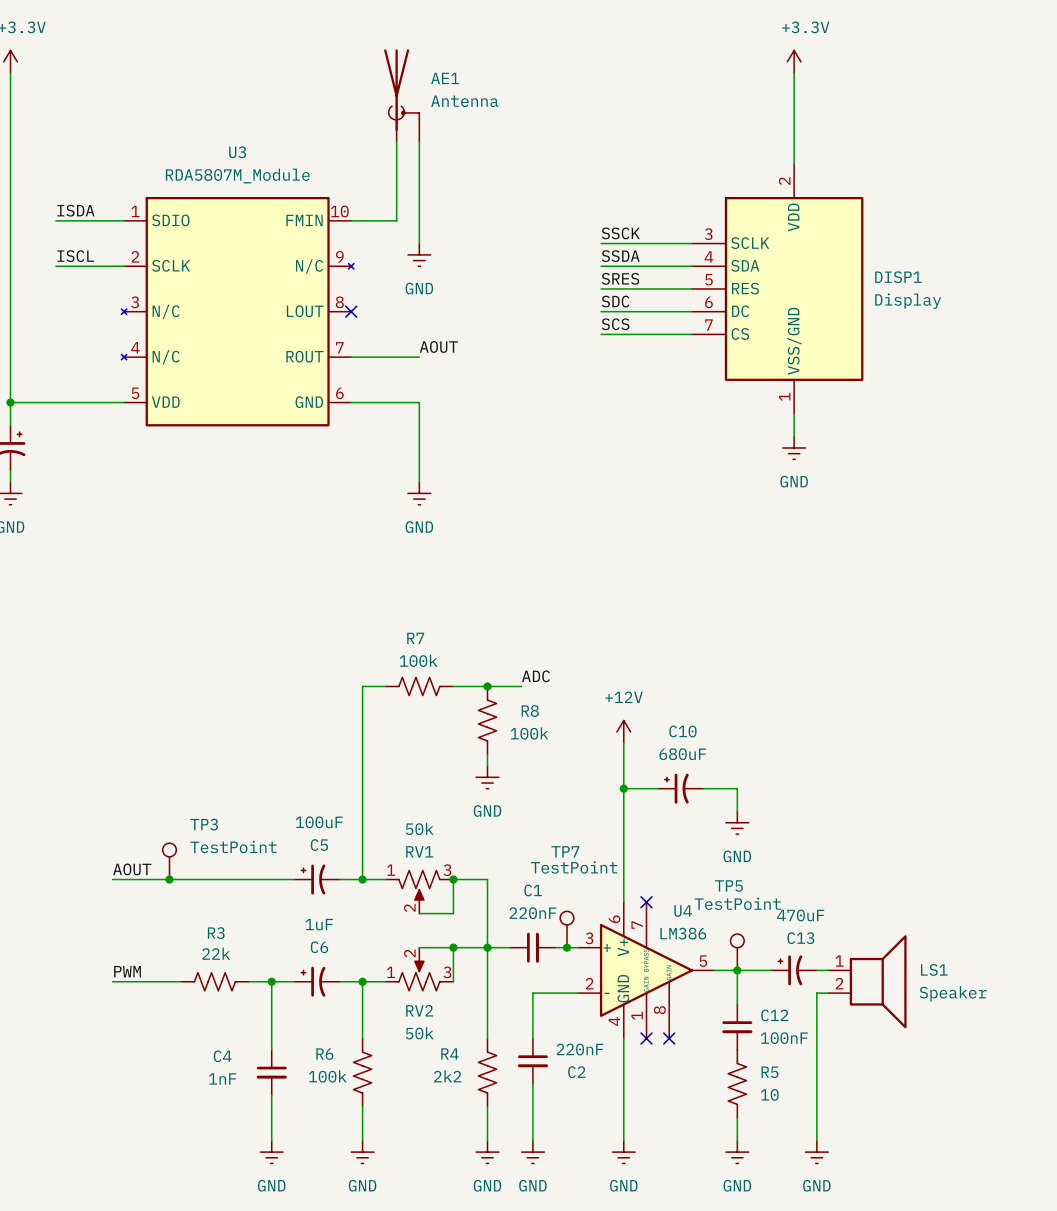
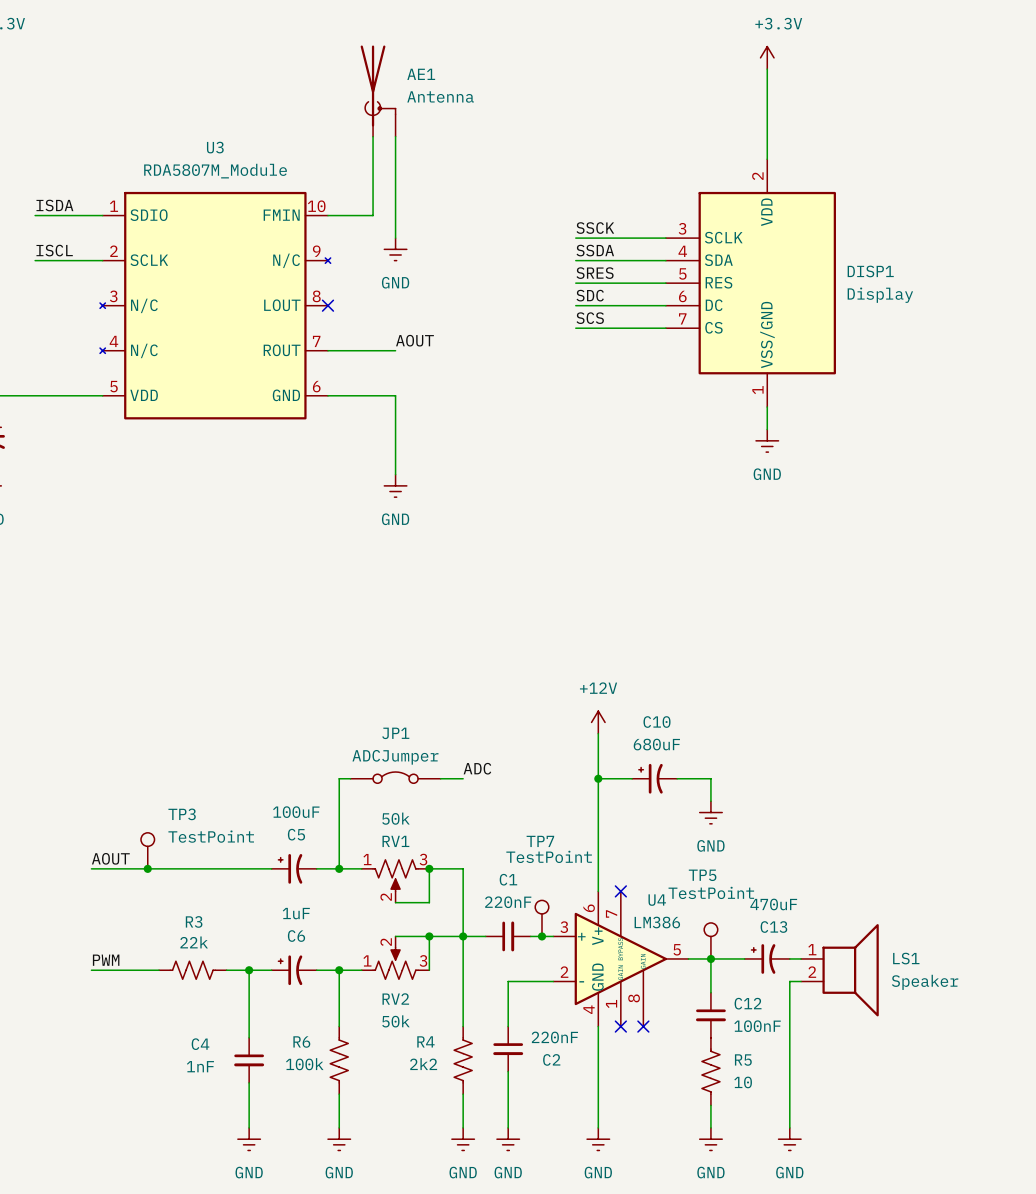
label position: ADC (535, 676) -> ADC (477, 768)
wire: (385, 686) (362, 686) (362, 788) -> (350, 778) (339, 778)
R7: 100k (419, 686) -> none
wire: (453, 686) (521, 686) -> none
junction: (487, 686) -> none
R8: 100k (487, 720) -> none
wire: (487, 754) (487, 765) -> none
power symbol: GND (487, 777) -> none
JP1: none -> ADCJumper (395, 777)
wire: none -> (440, 778) (463, 778)

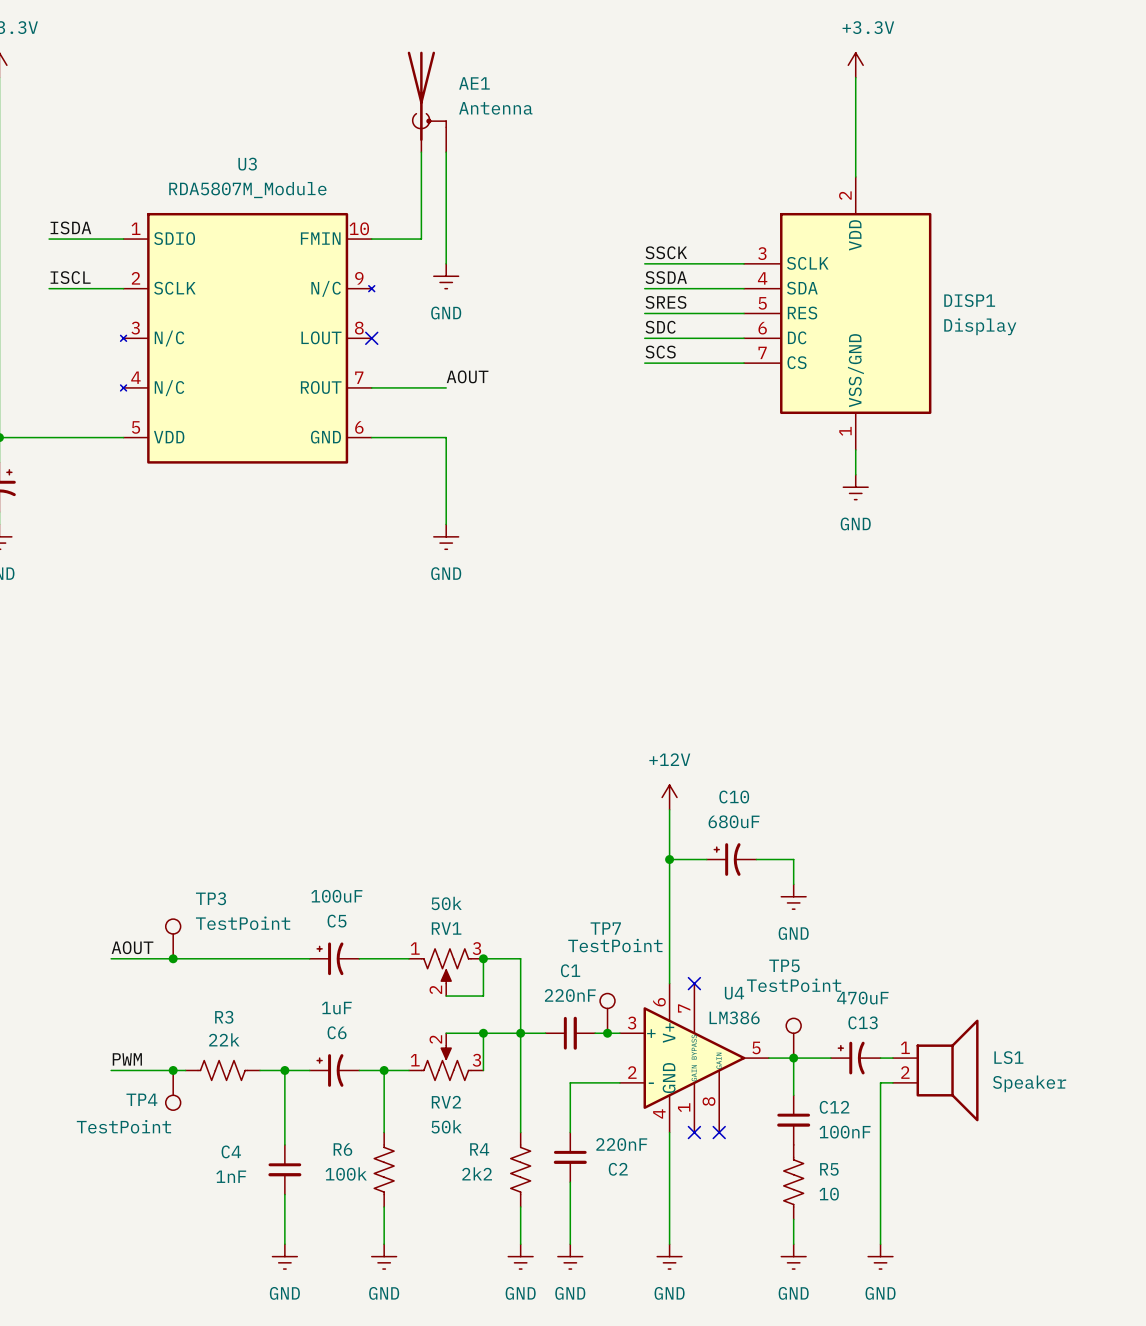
label: ADC (477, 768) -> none
JP1: ADCJumper (395, 777) -> none
wire: (350, 778) (339, 778) (339, 868) -> none
wire: (440, 778) (463, 778) -> none
junction: (339, 868) -> none
junction: none -> (173, 1070)
TP4: none -> TestPoint (173, 1090)

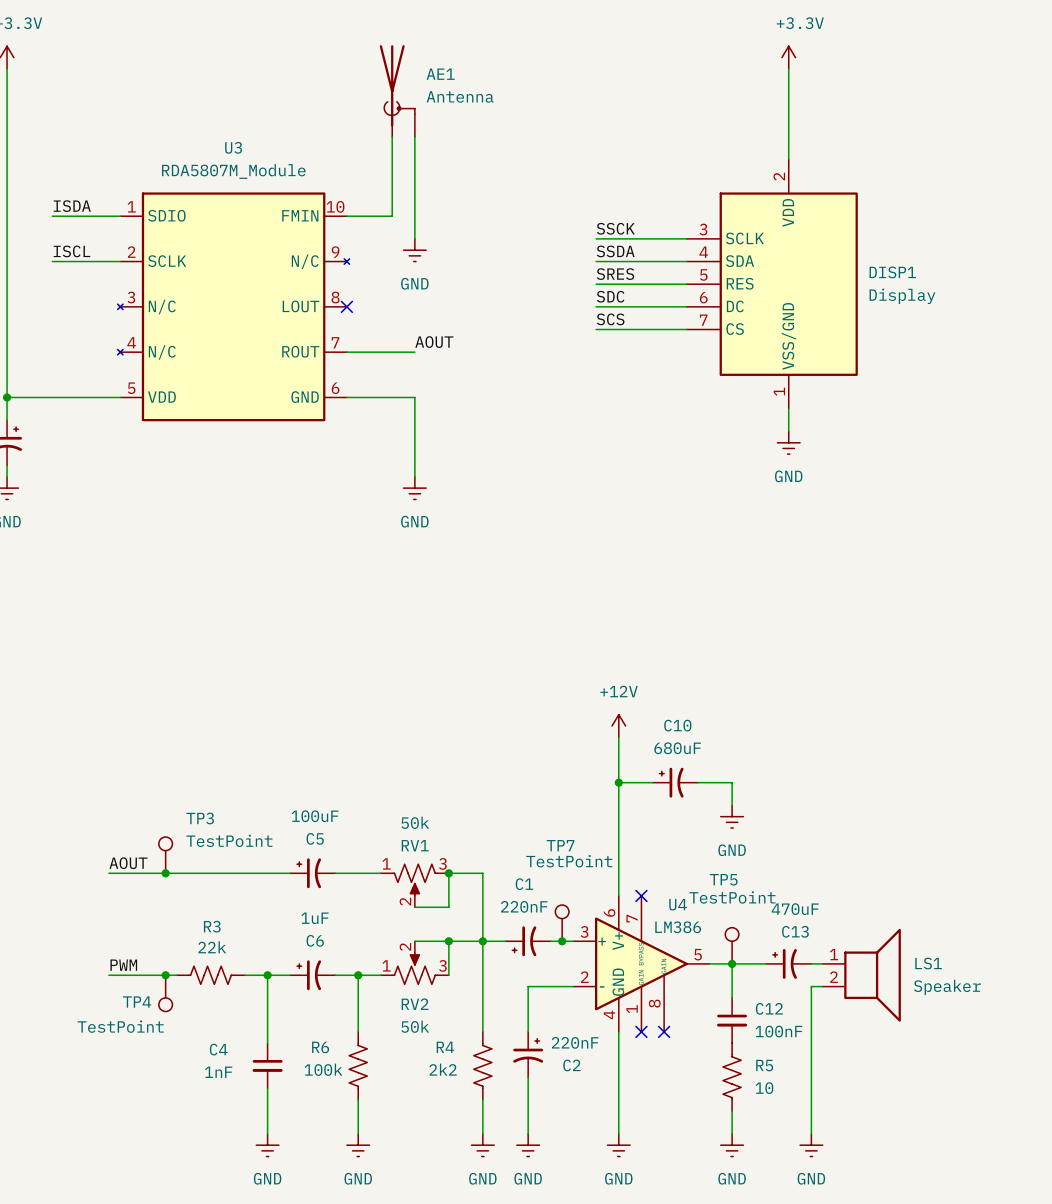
C1 symbol: [545, 1016, 596, 1050] -> [505, 926, 551, 957]
C2 symbol: [553, 1132, 587, 1183] -> [513, 1031, 544, 1078]

